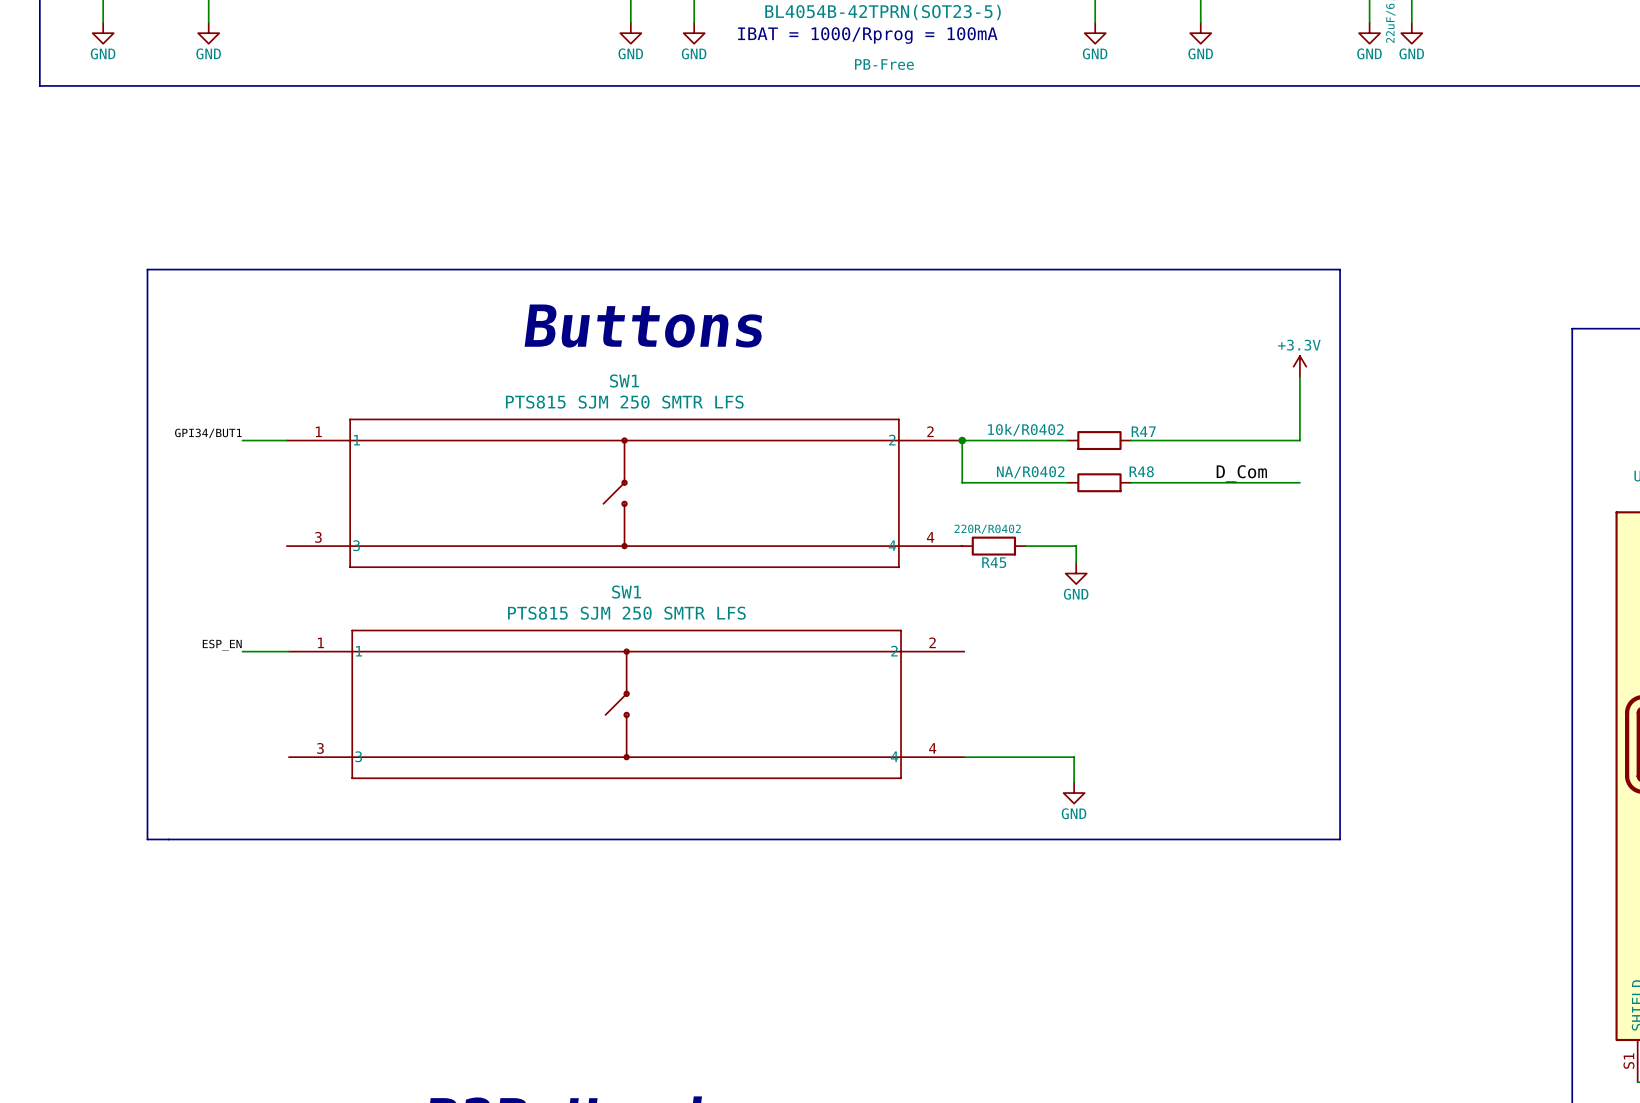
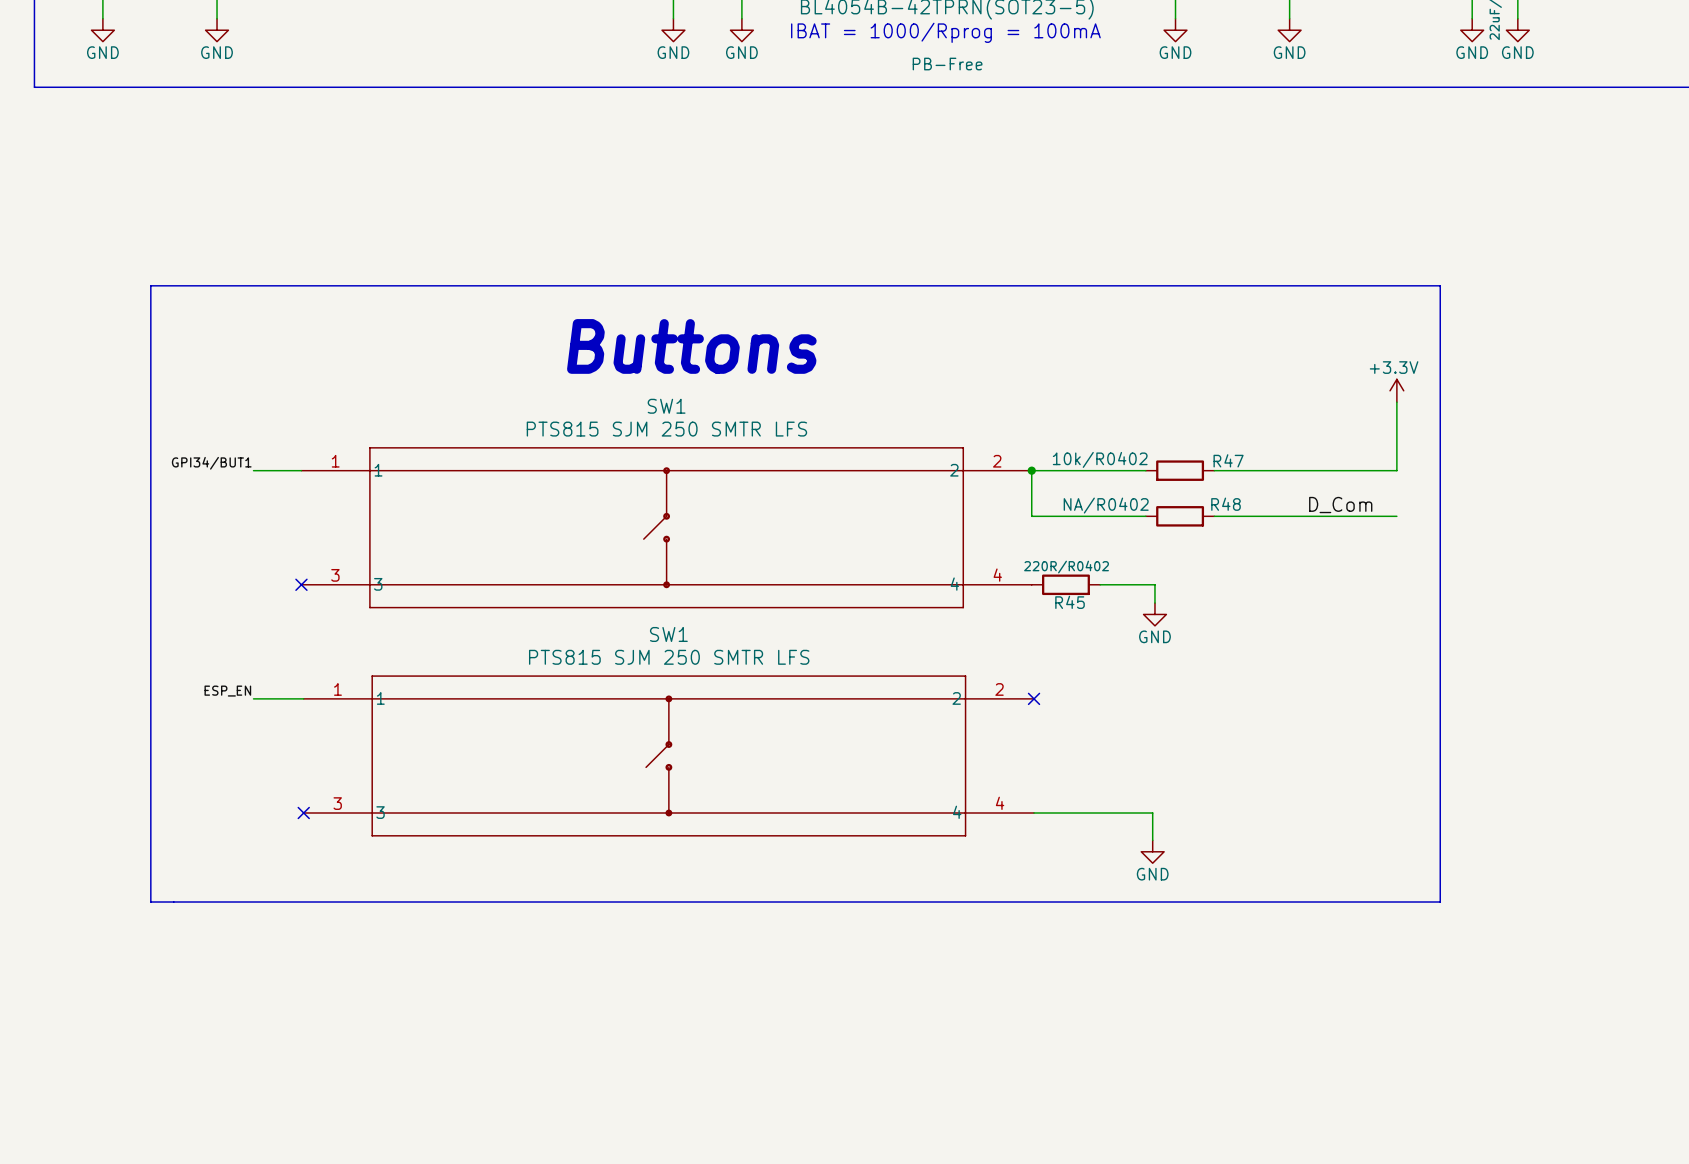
no-connect mark: none -> (301, 584)
no-connect mark: none -> (1034, 698)
no-connect mark: none -> (303, 812)

